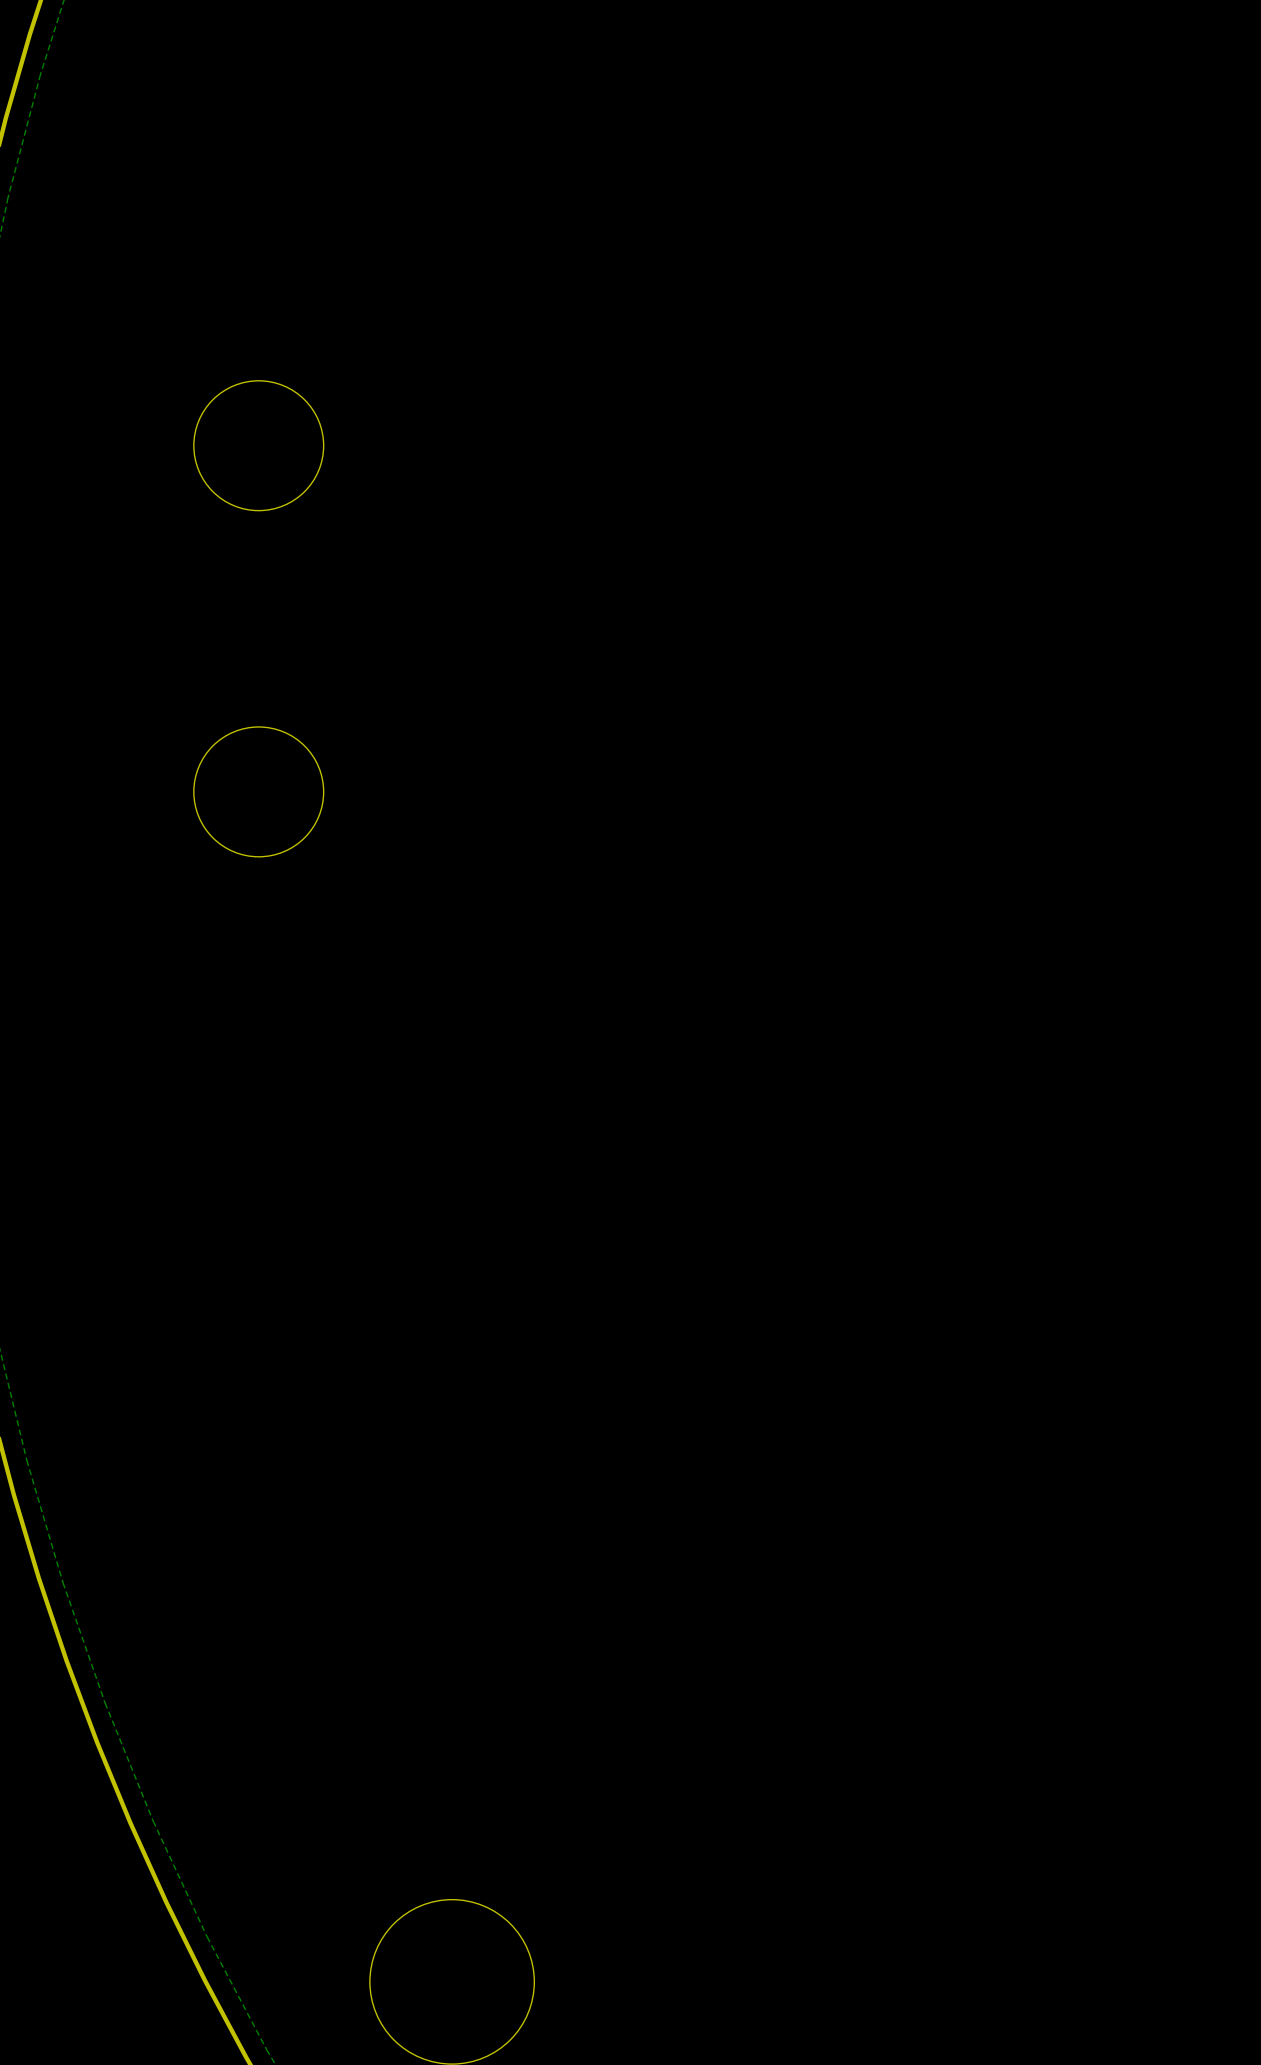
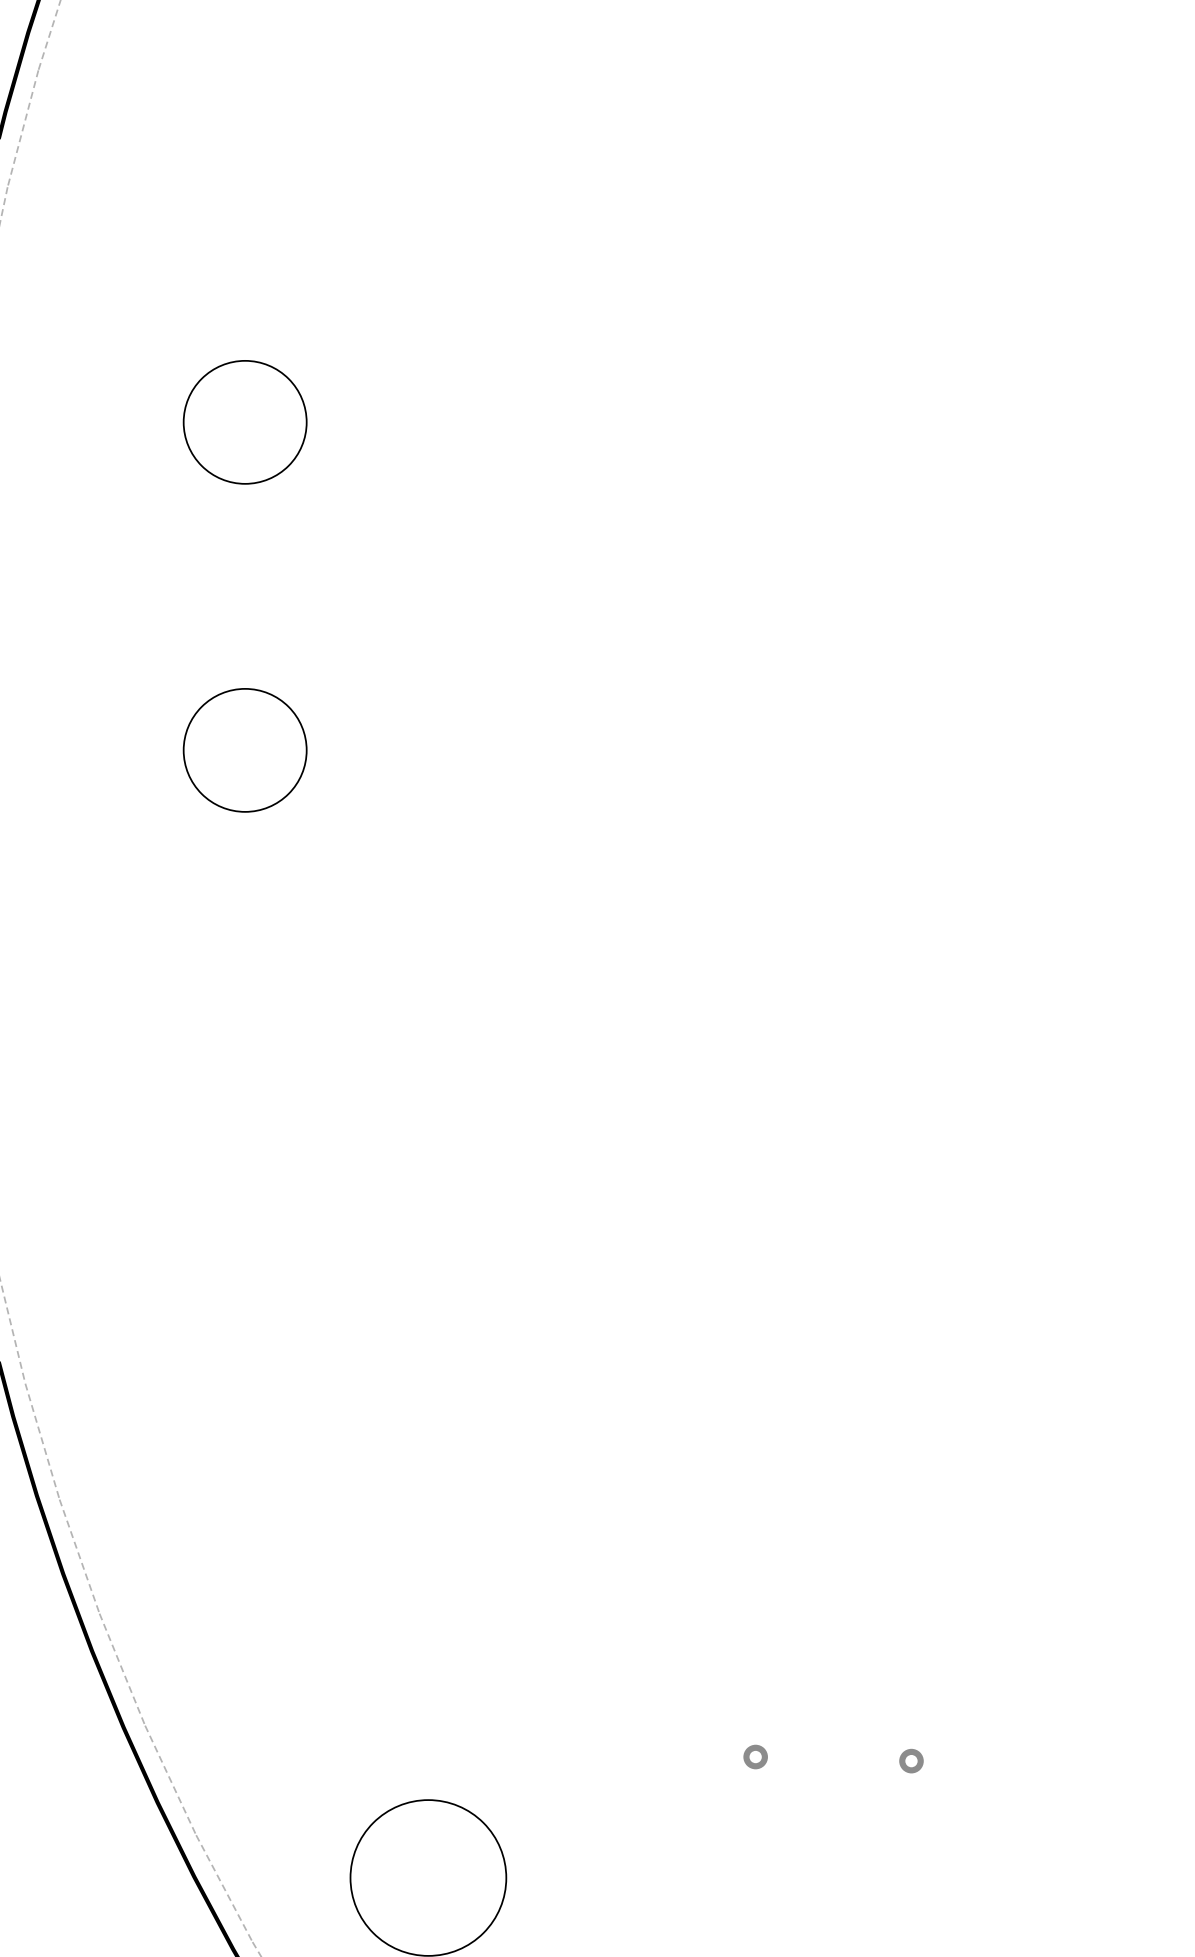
via: none -> (755, 1757)
via: none -> (911, 1761)

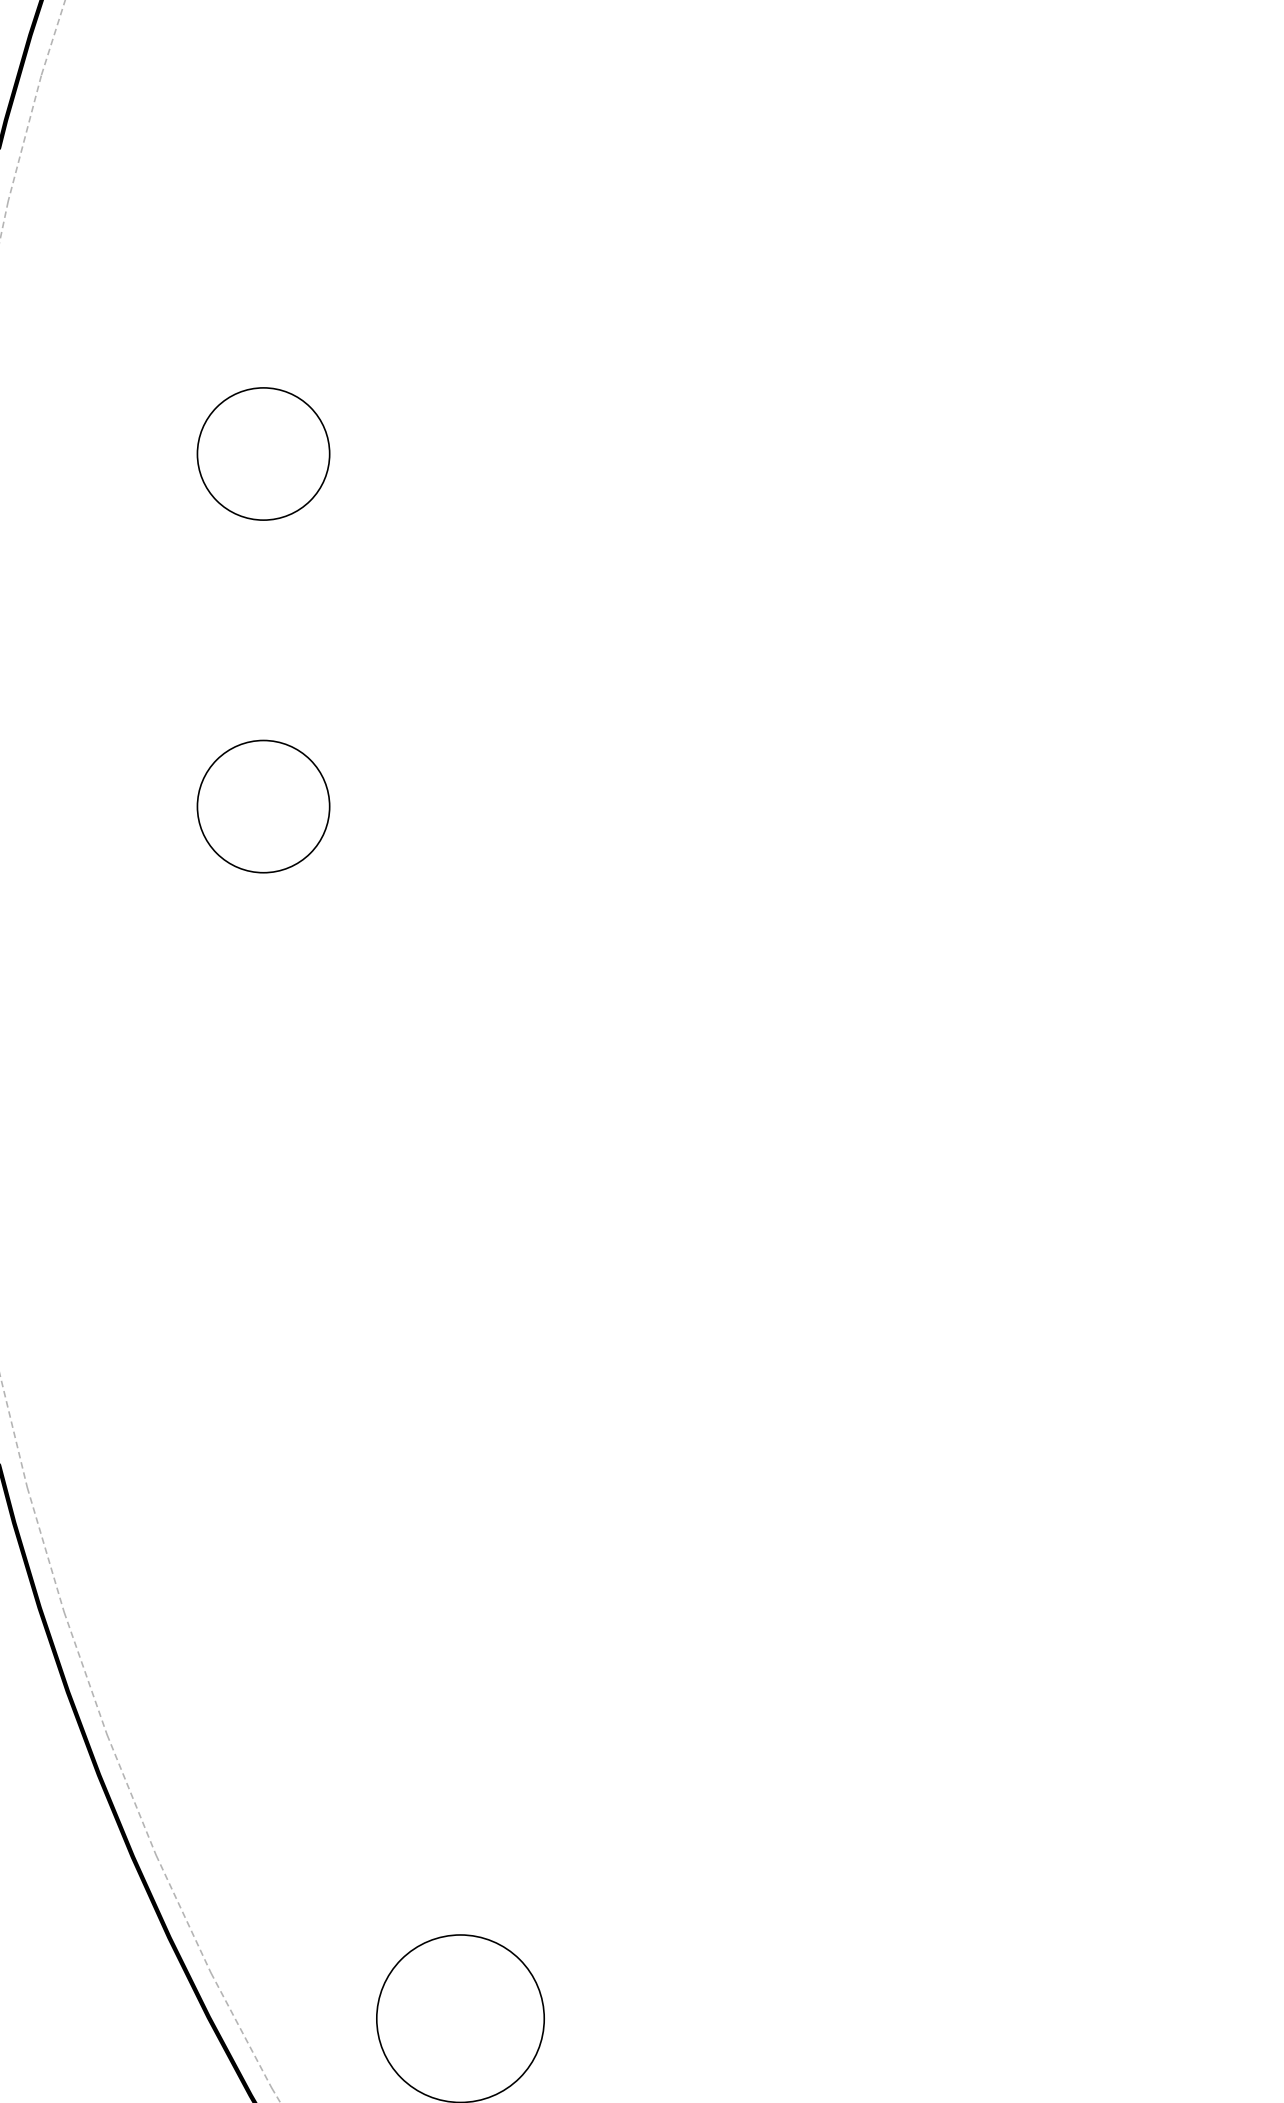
via: (755, 1757) -> none
via: (911, 1761) -> none

